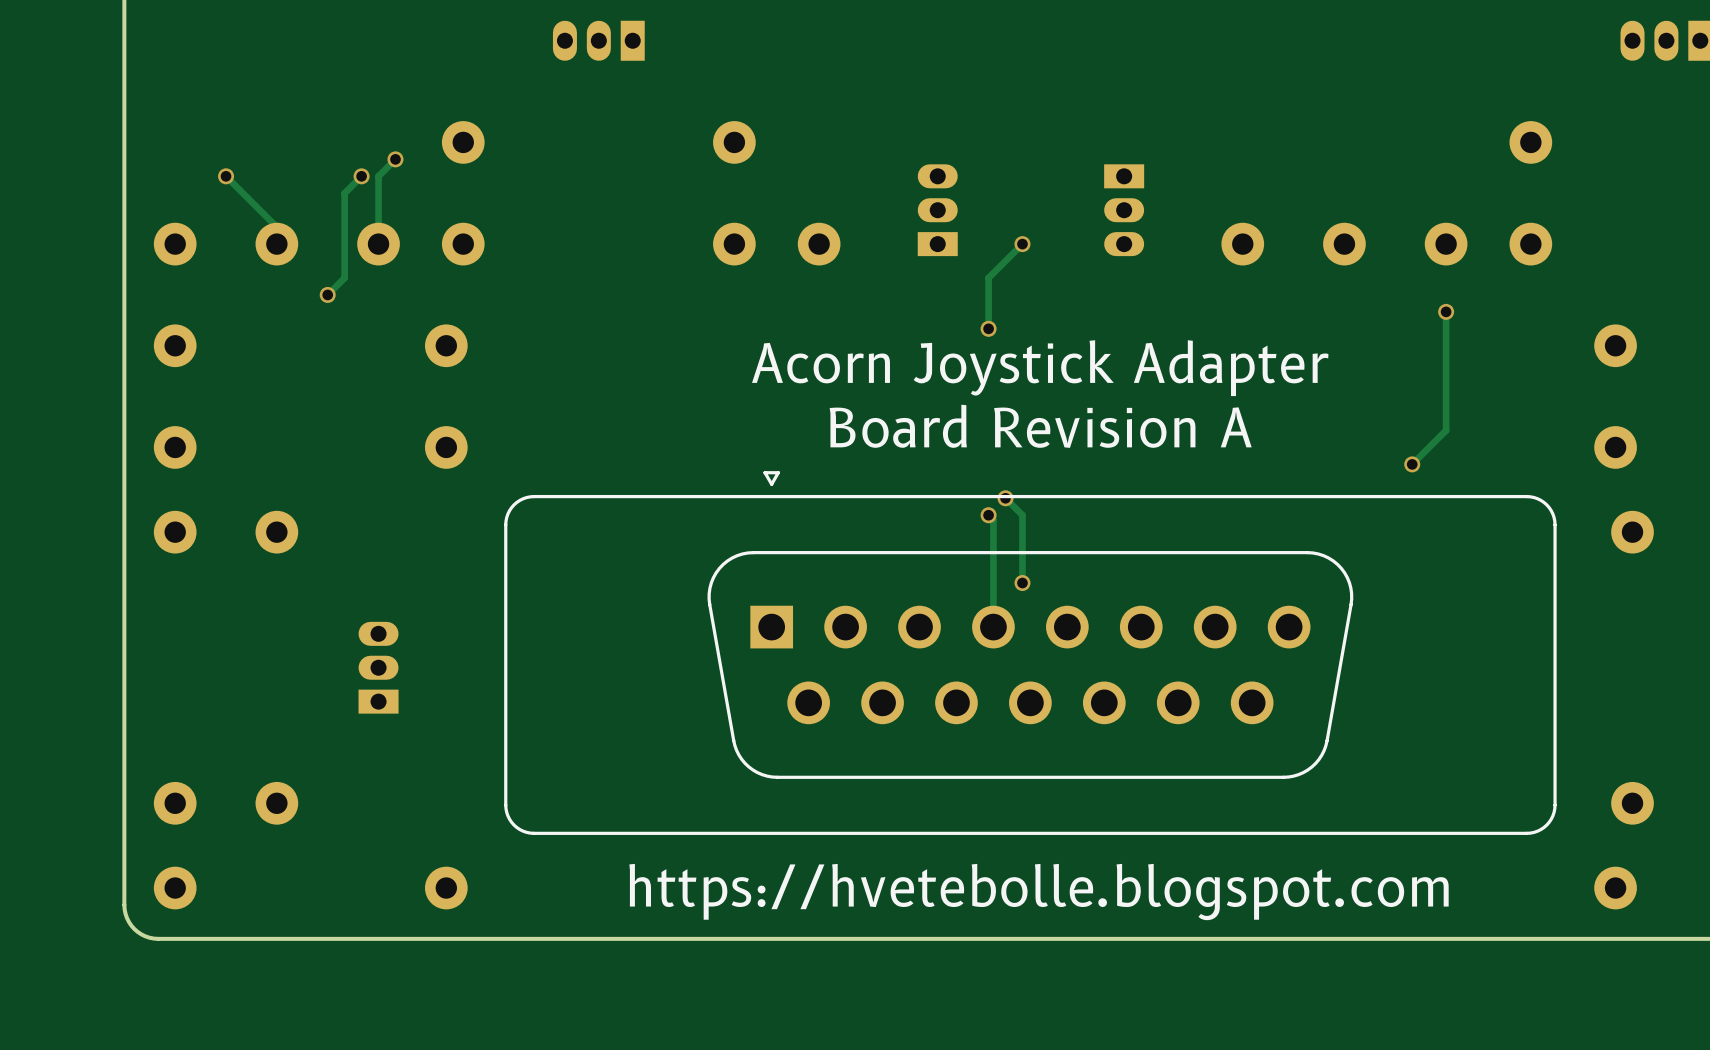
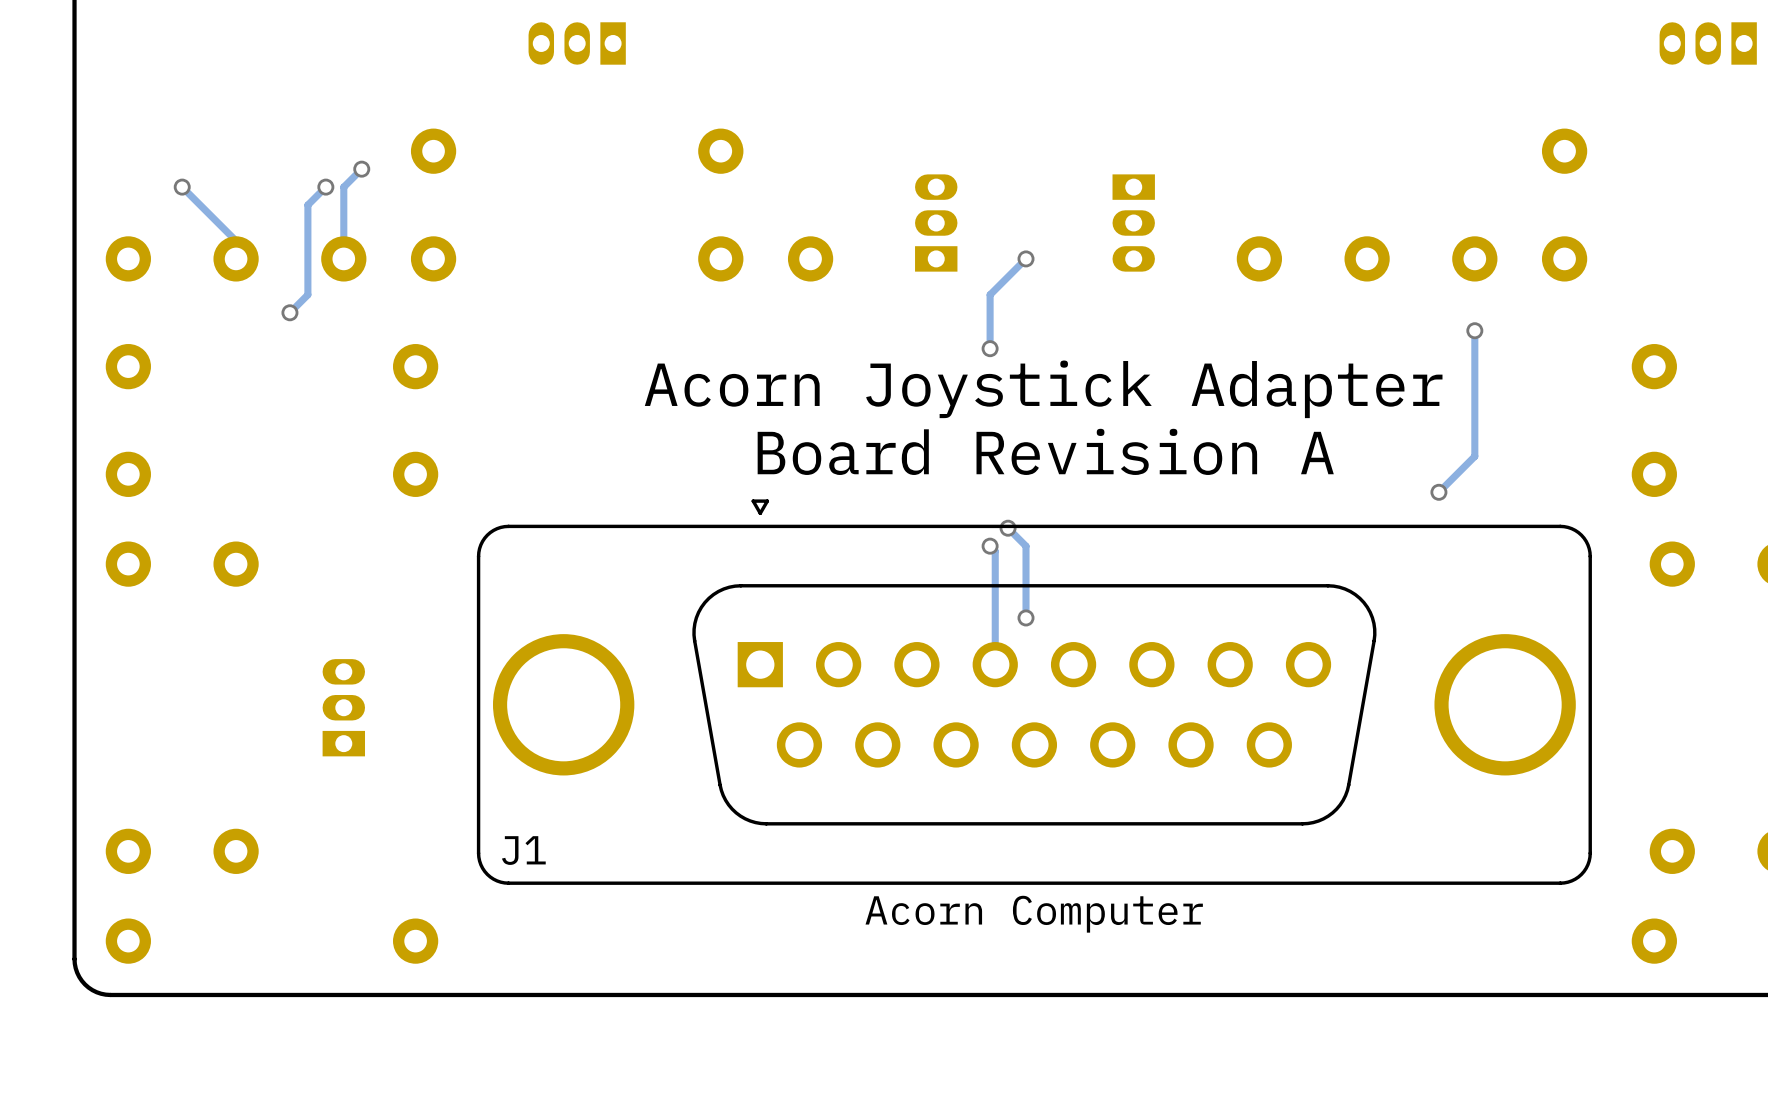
J1: none -> Acorn Computer (1034, 692)
text: https://hvetebolle.blogspot.com (1039, 892) -> none

